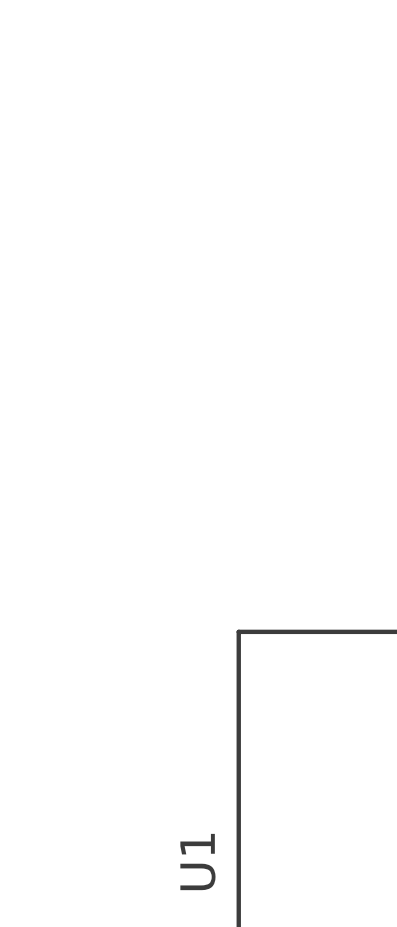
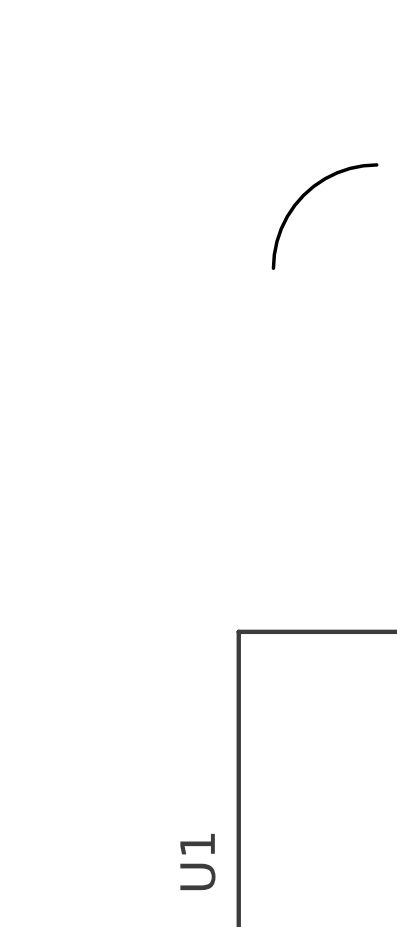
board edge: none -> (376, 164) (363, 165) (337, 172) (325, 178) (303, 195) (287, 216) (281, 228) (276, 241) (273, 268)

